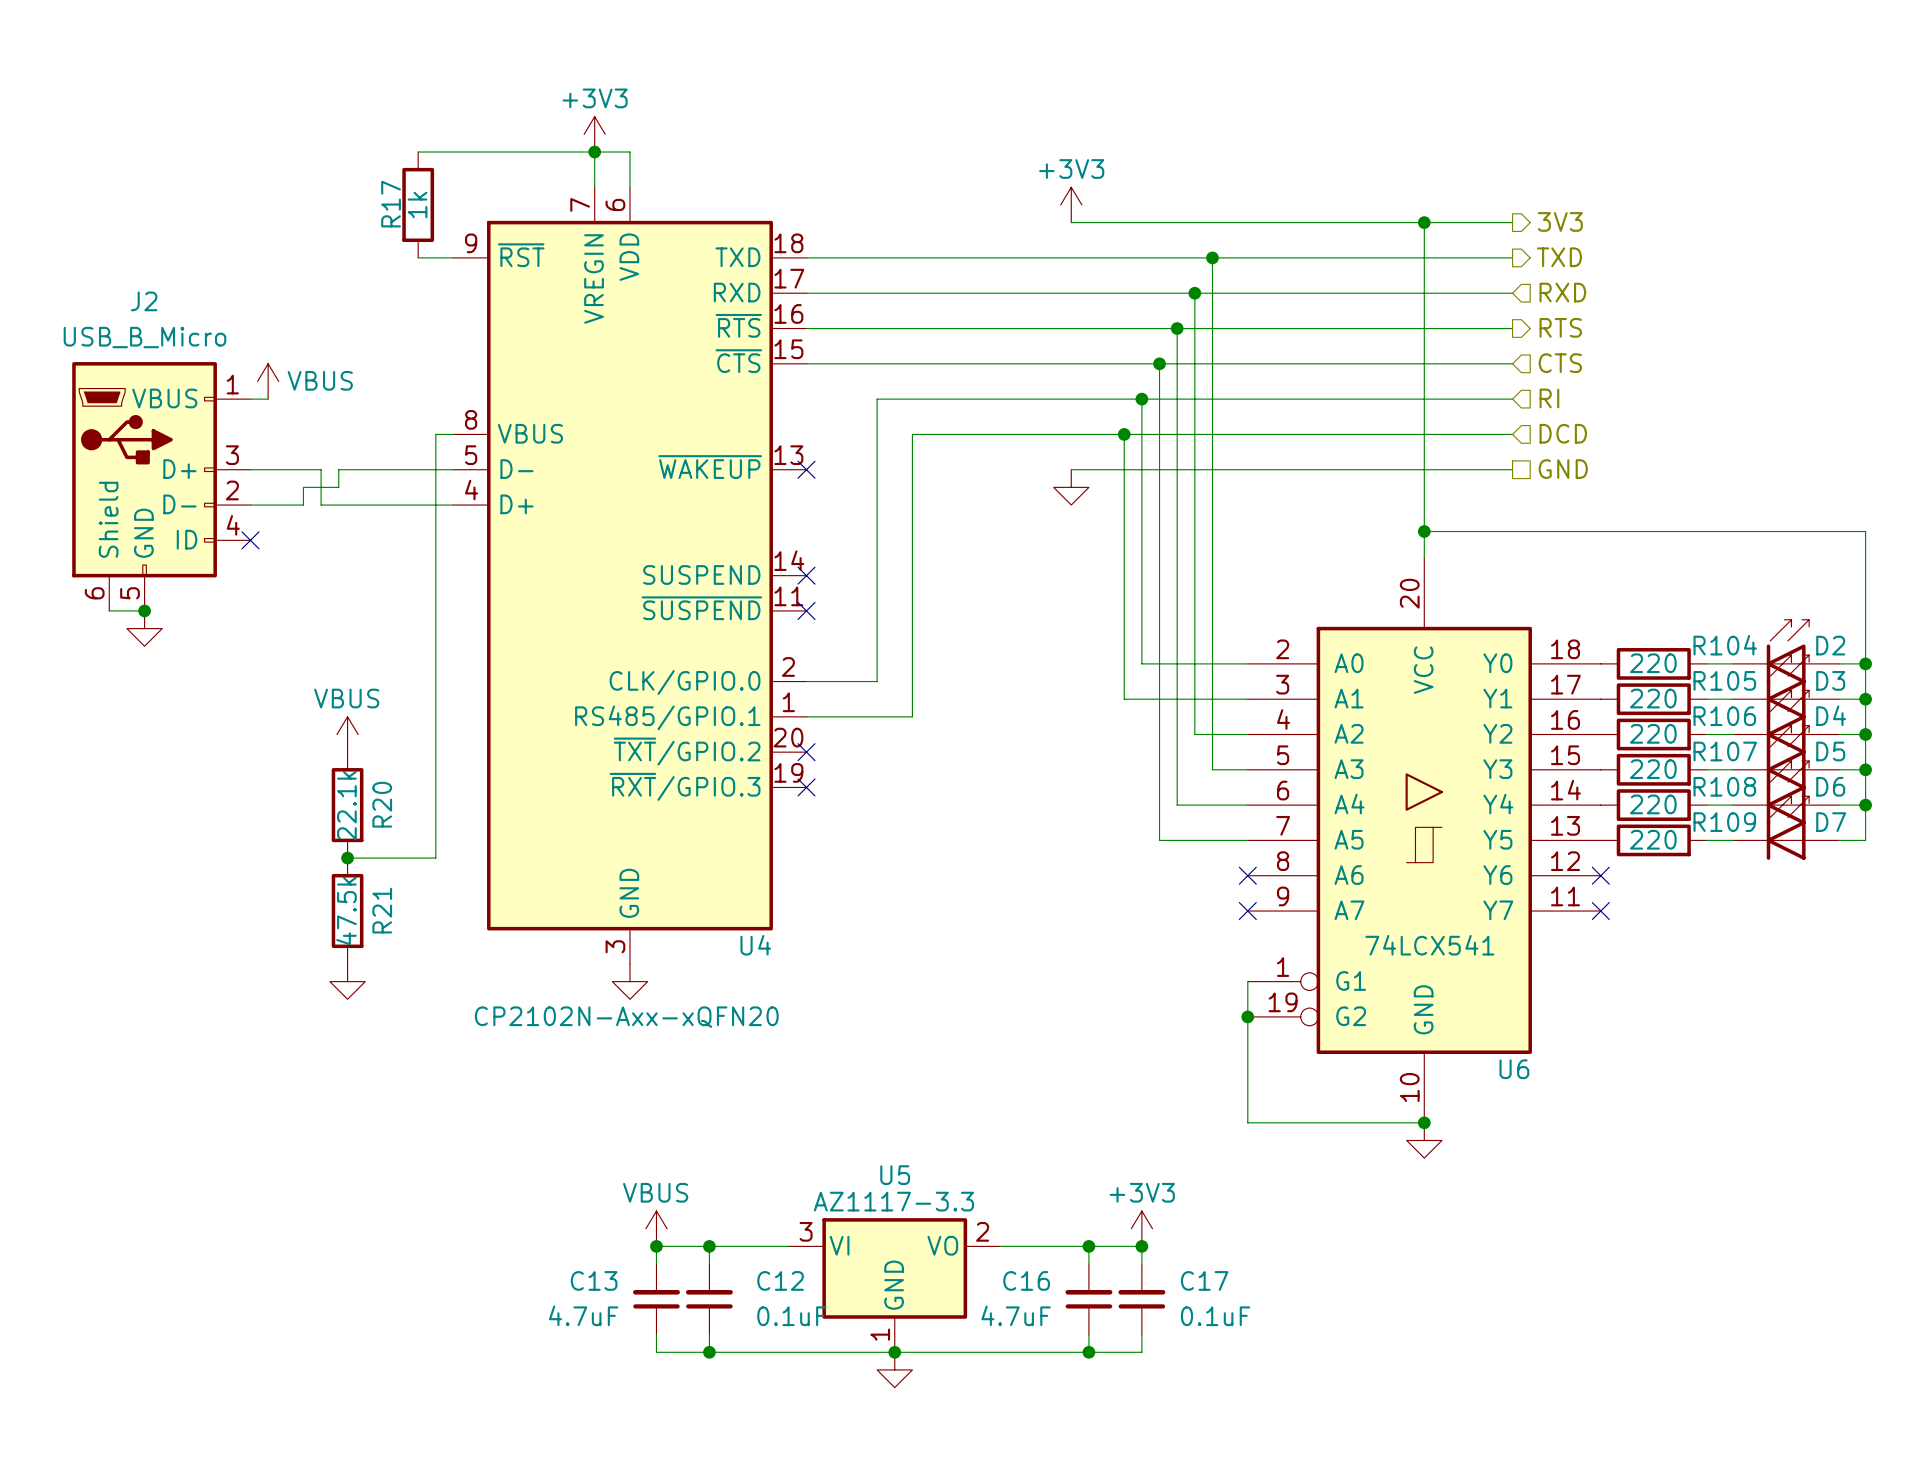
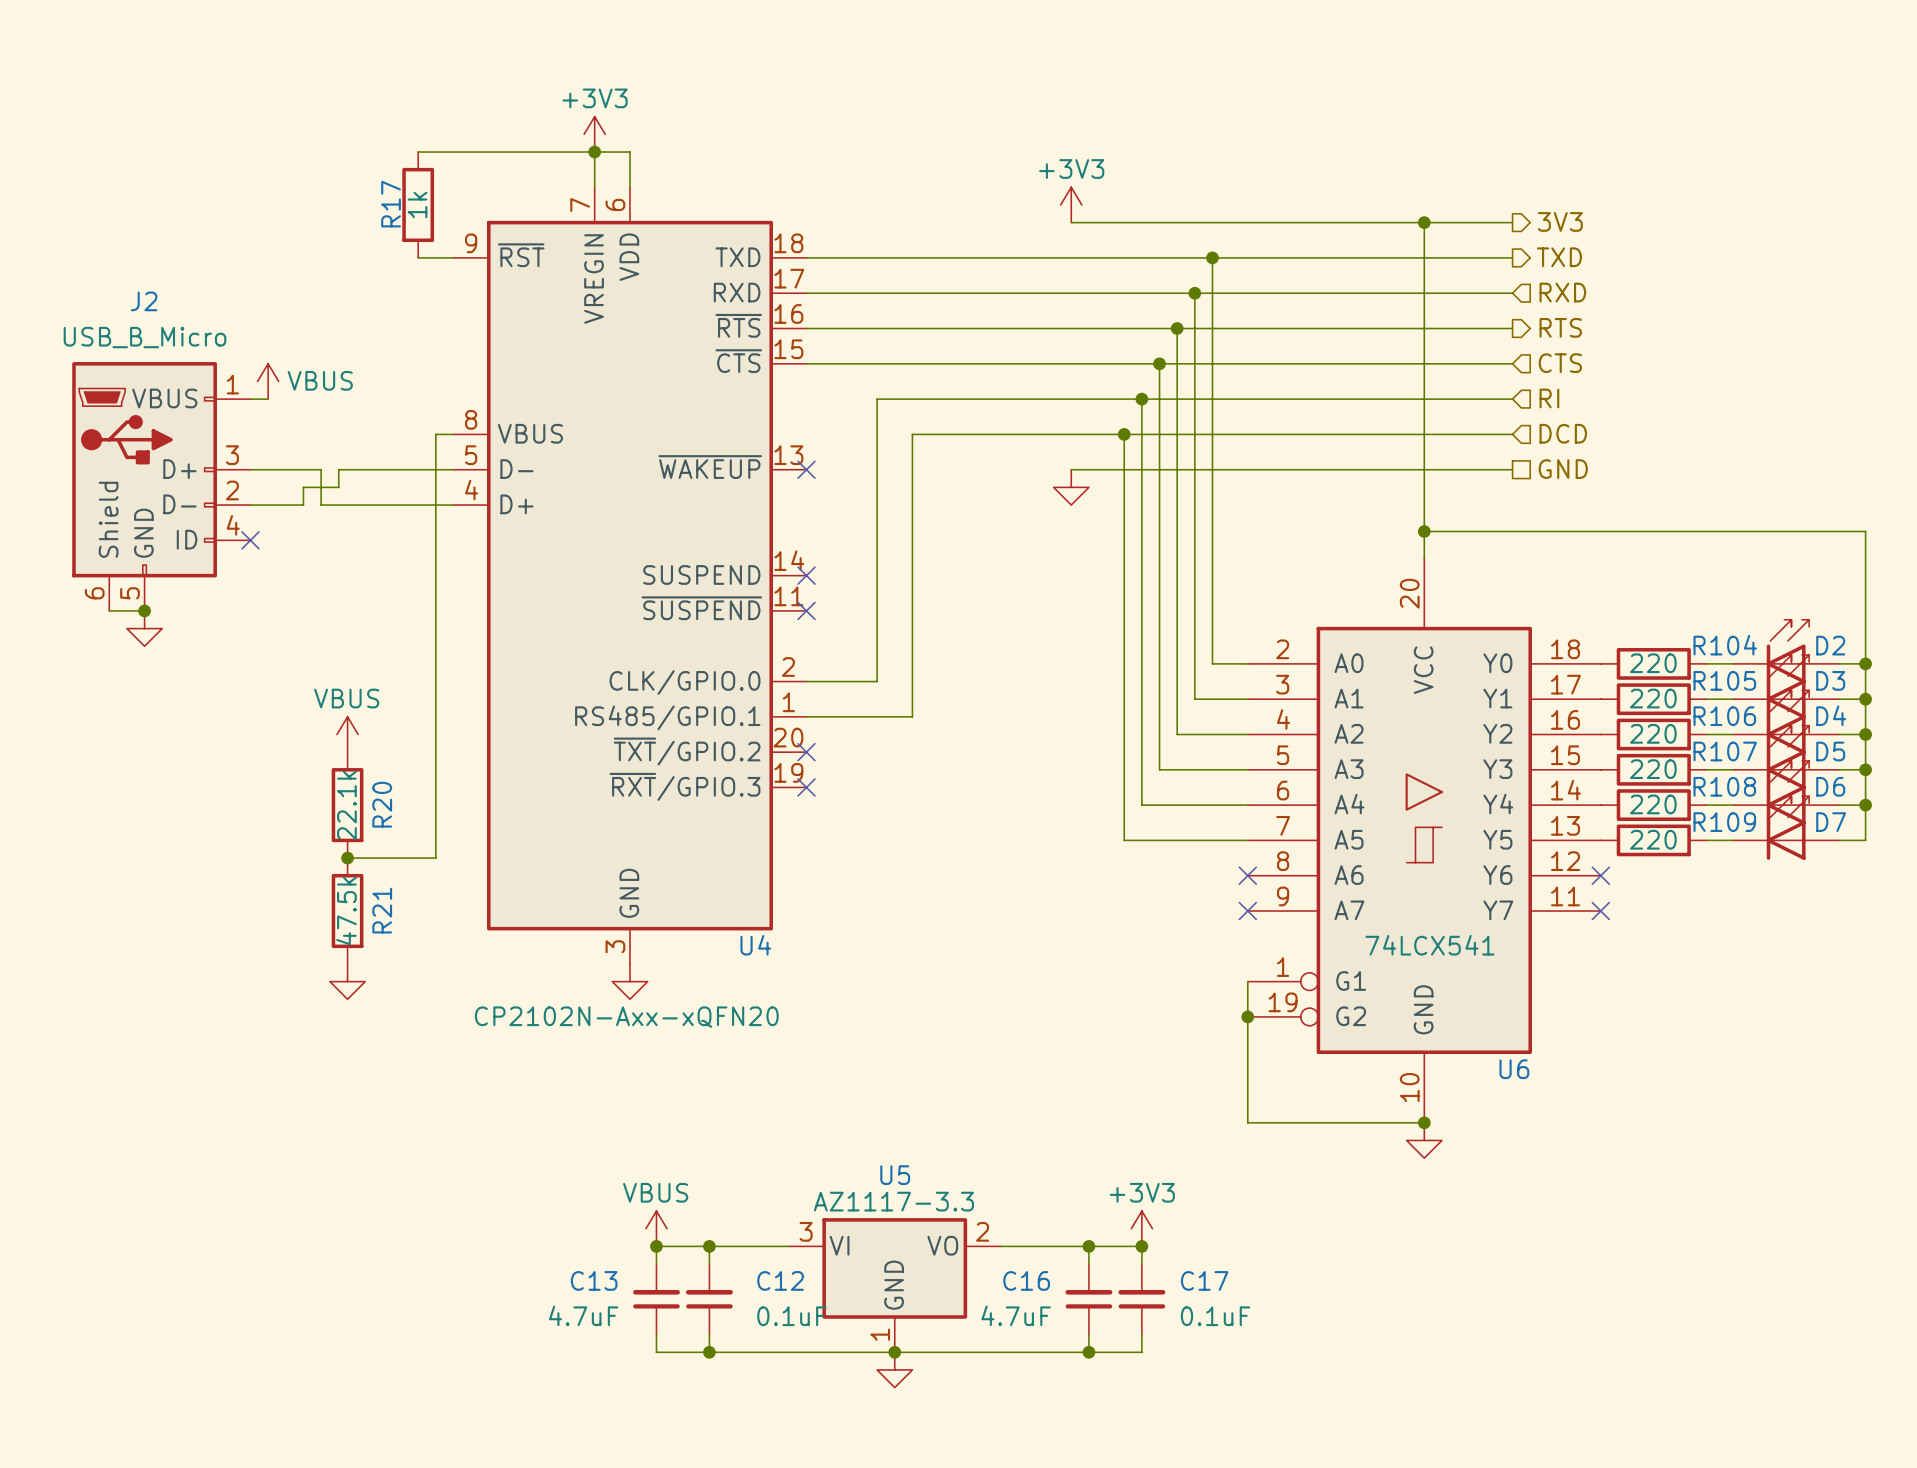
wire: (1141, 663) (1212, 663) (1212, 769) -> (1141, 663) (1141, 805) (1177, 805)
wire: (1124, 699) (1194, 699) (1194, 734) -> (1177, 734) (1194, 734)
wire: (1177, 734) (1177, 805) -> none
wire: (1159, 769) (1159, 840) -> (1124, 699) (1124, 840) (1159, 840)
wire: none -> (1159, 769) (1212, 769)

